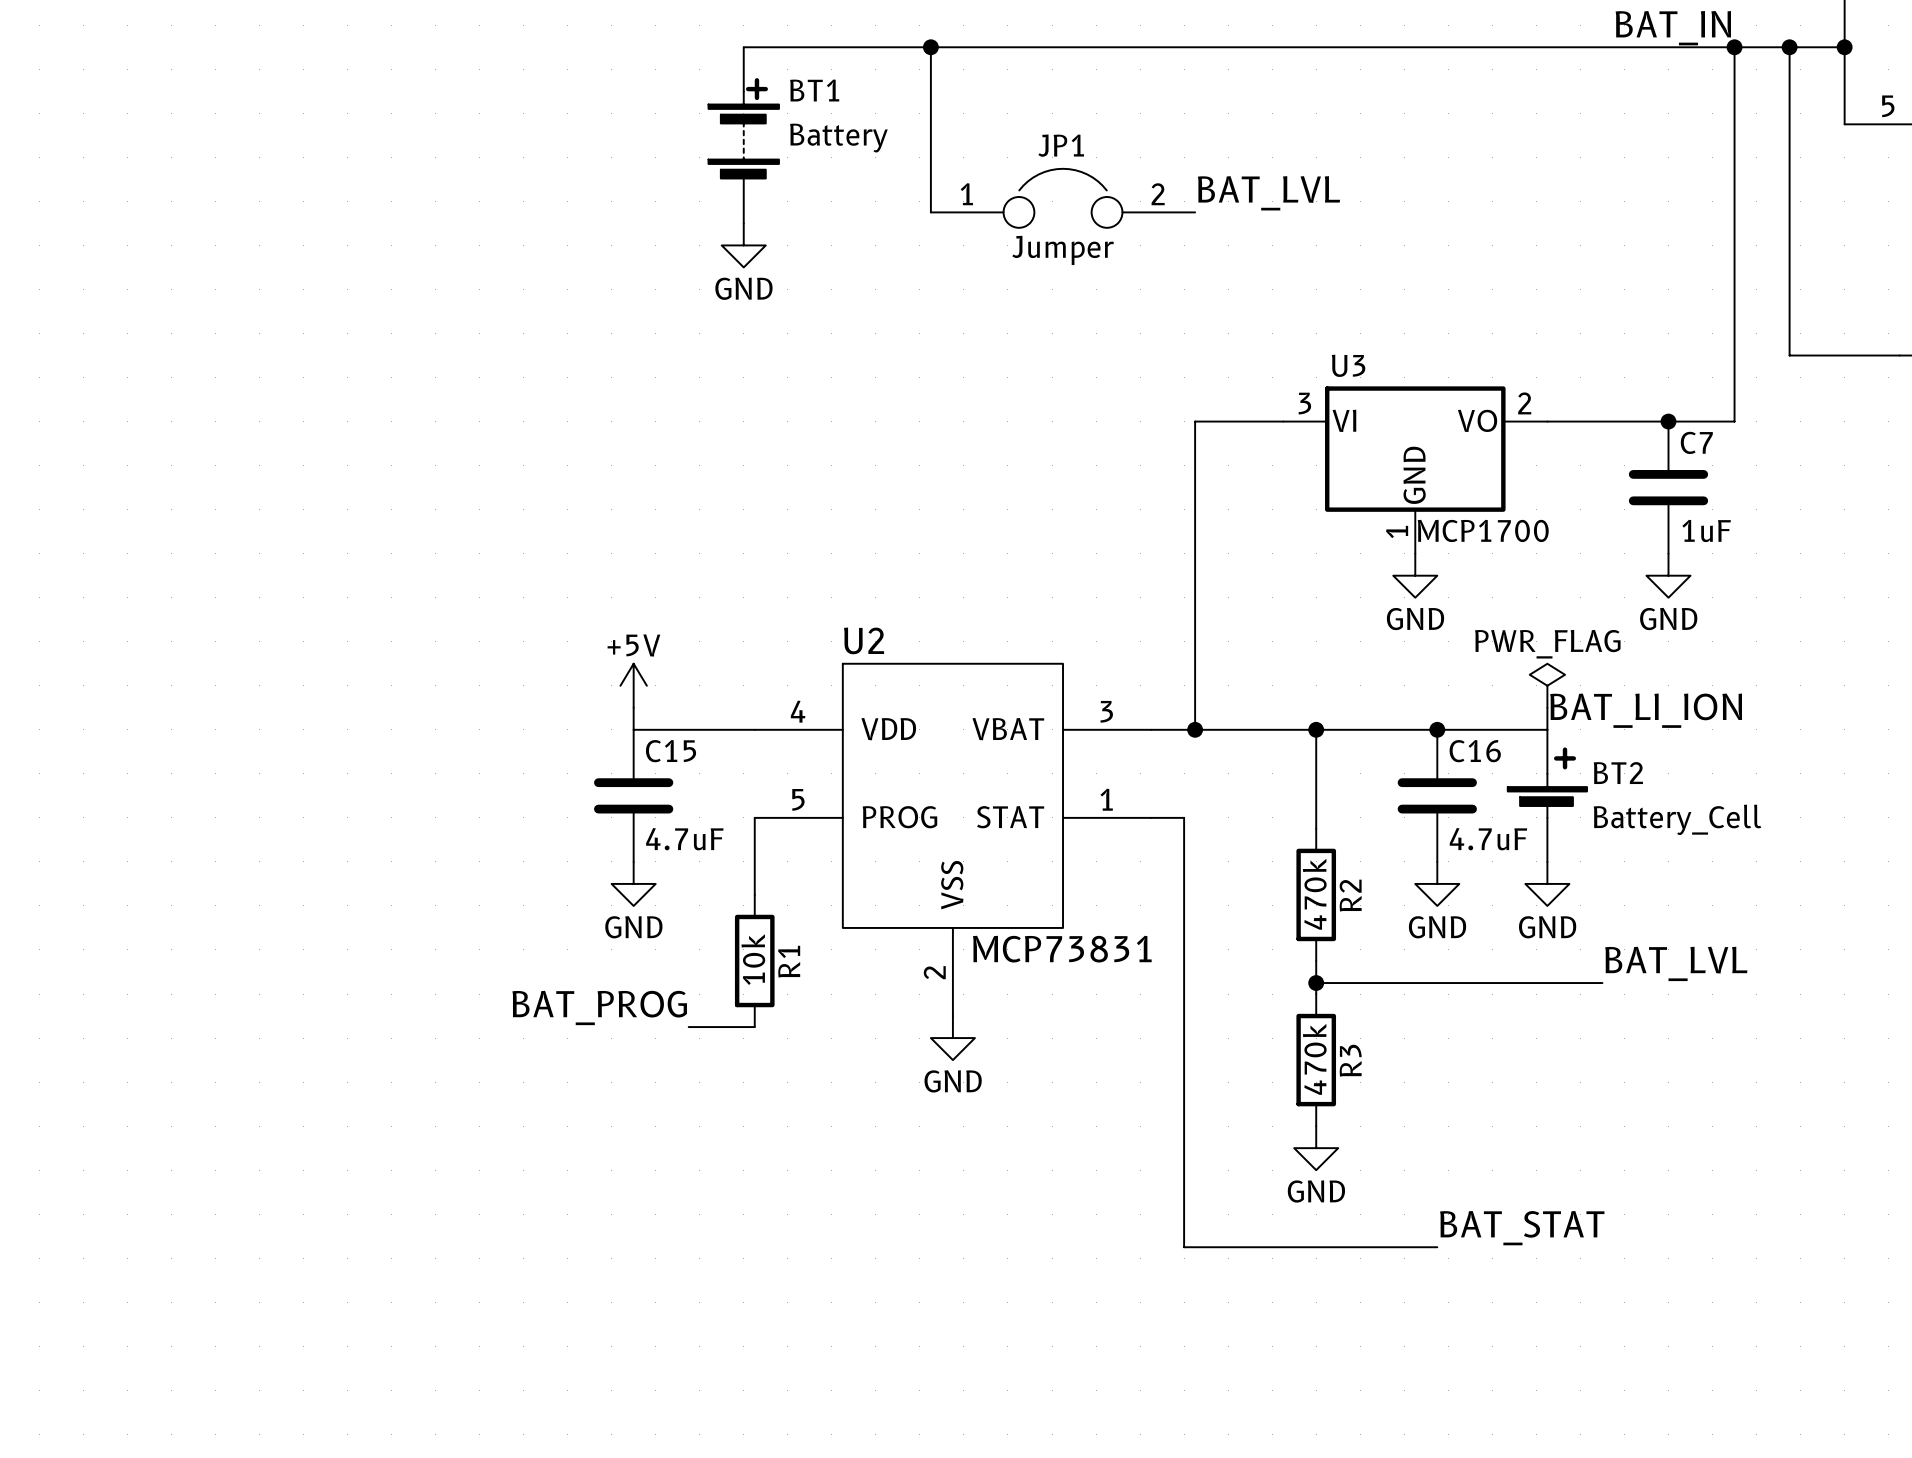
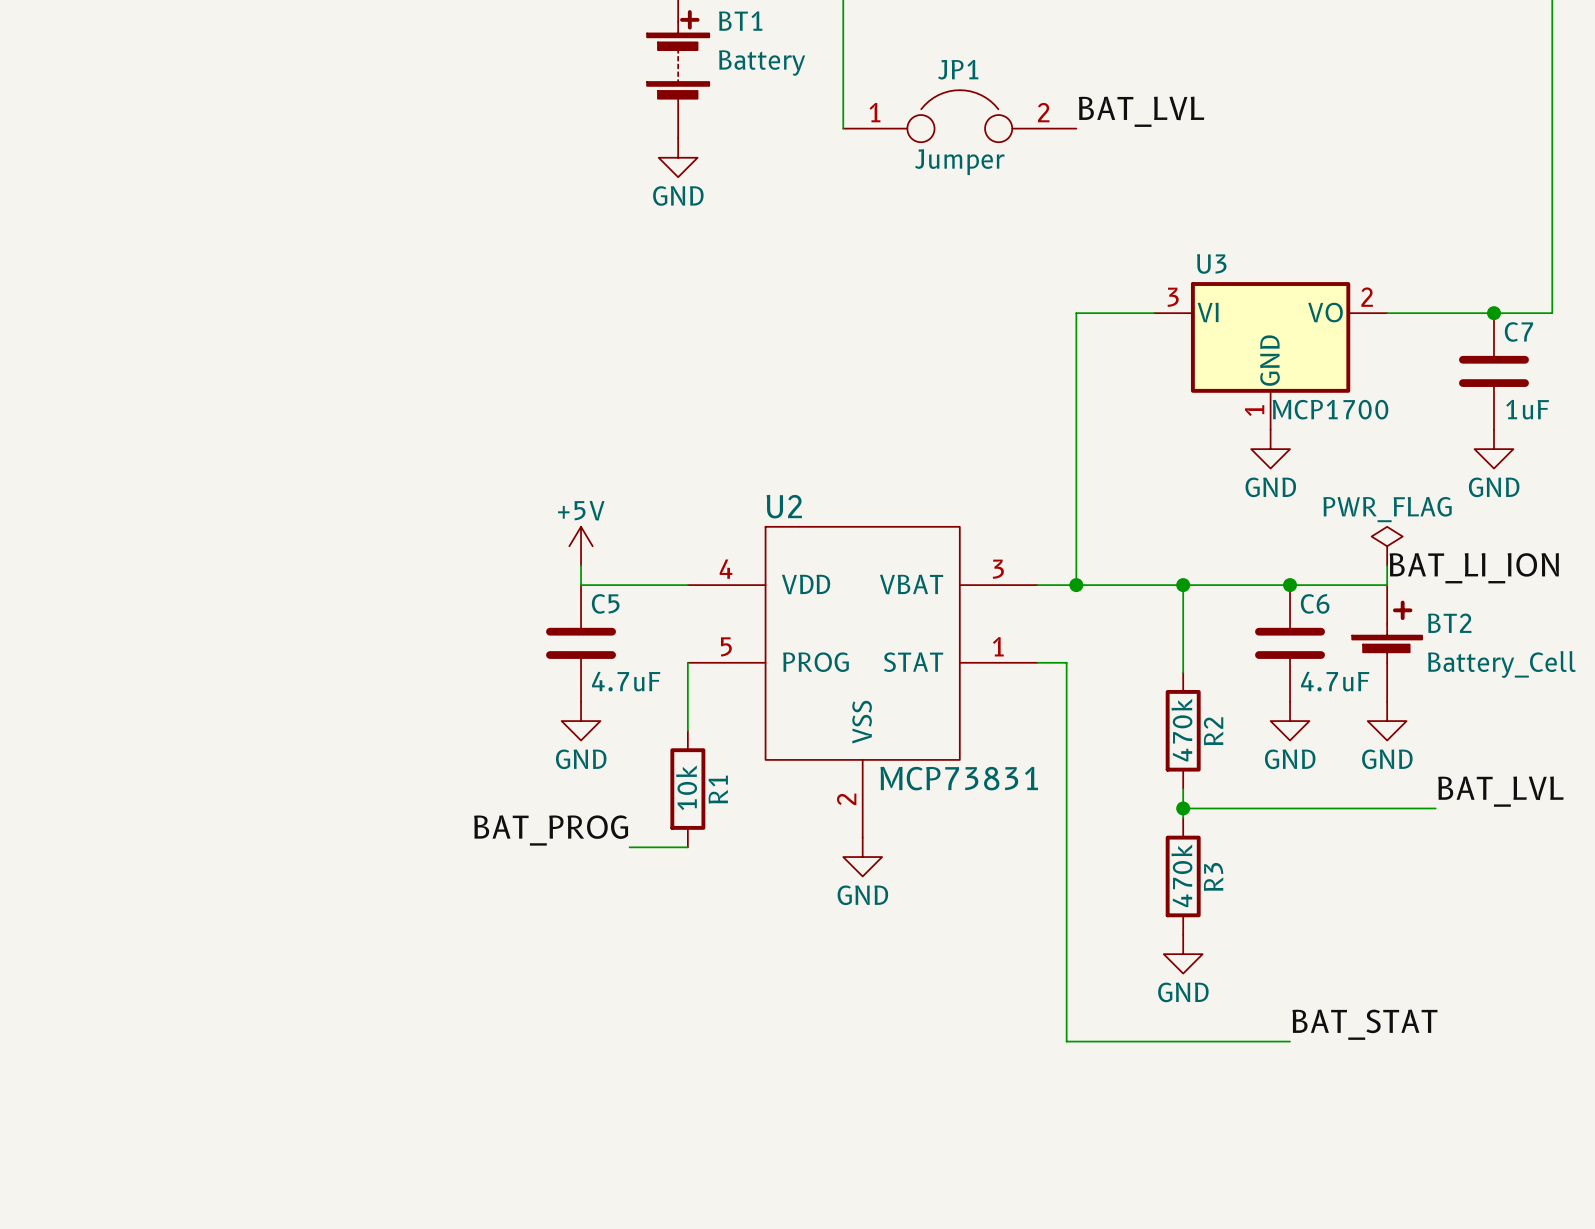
C15 name: C15 (671, 751) -> C5 (605, 603)
C16 name: C16 (1475, 751) -> C6 (1315, 603)

